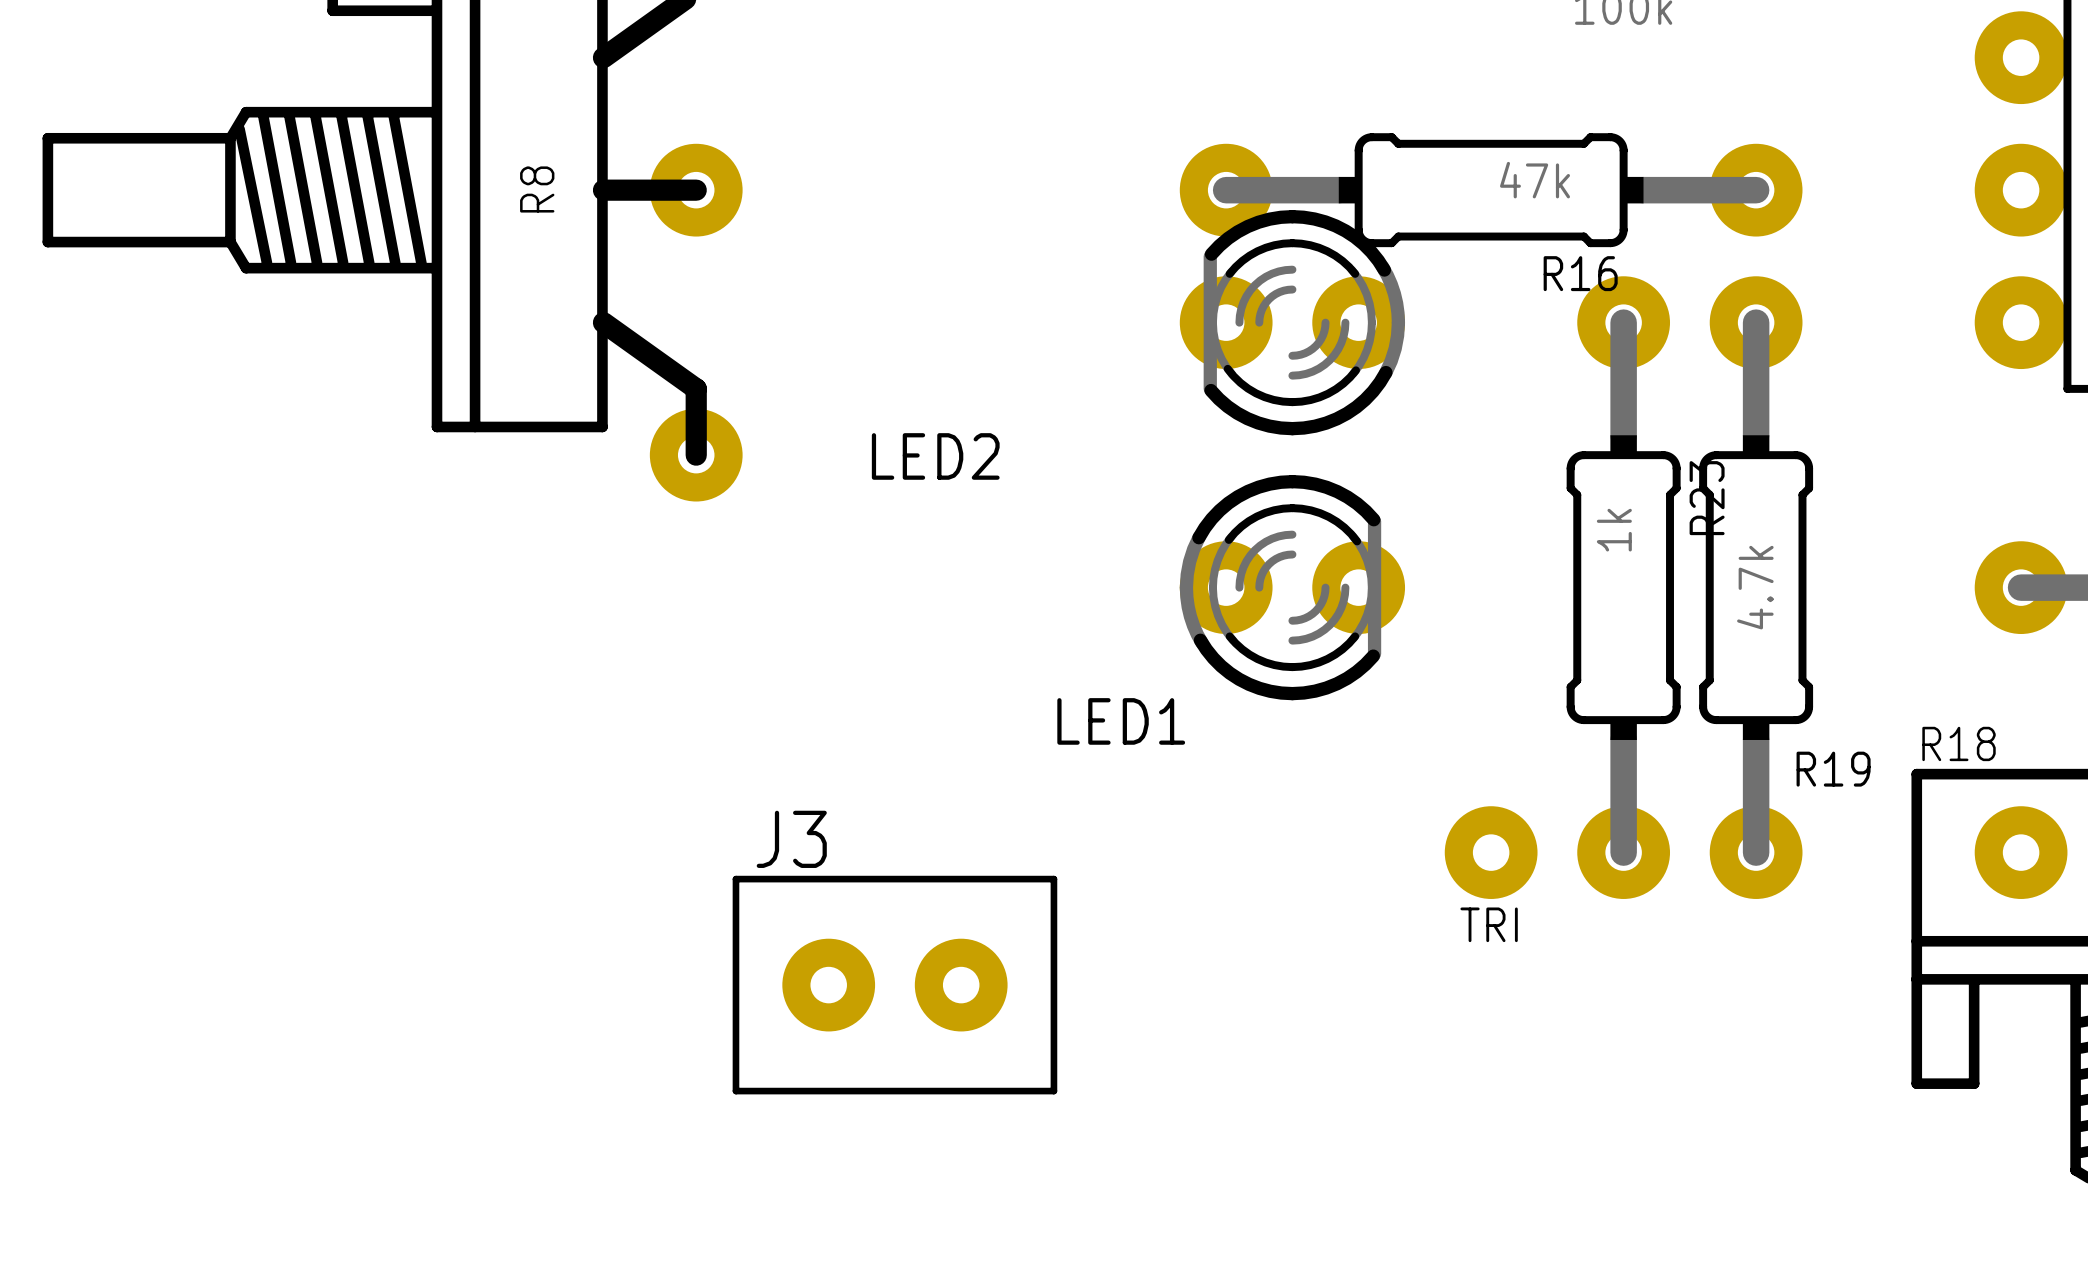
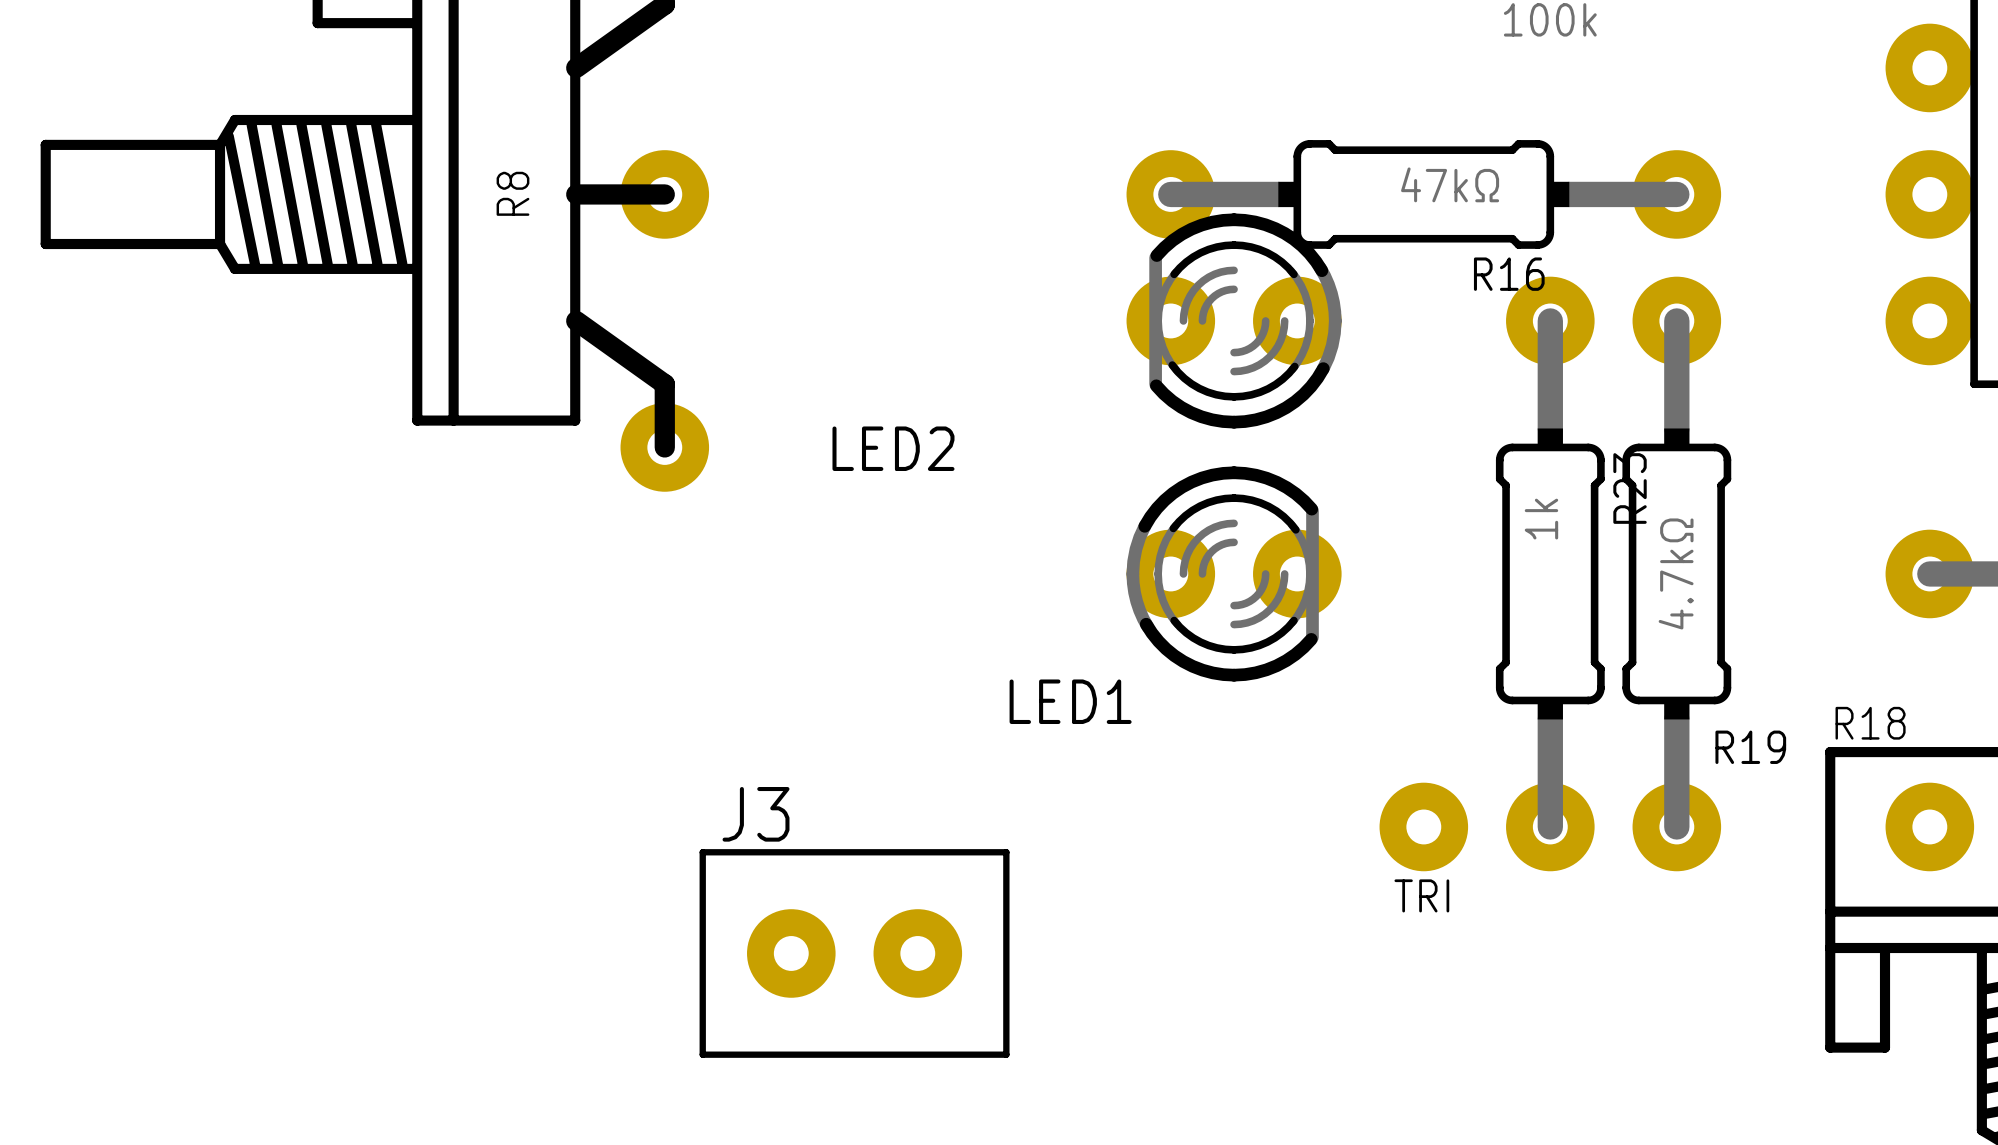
R16 value: 47k (1535, 180) -> 47kΩ (1450, 184)
R19 value: 4.7k (1755, 587) -> 4.7kΩ (1676, 573)

